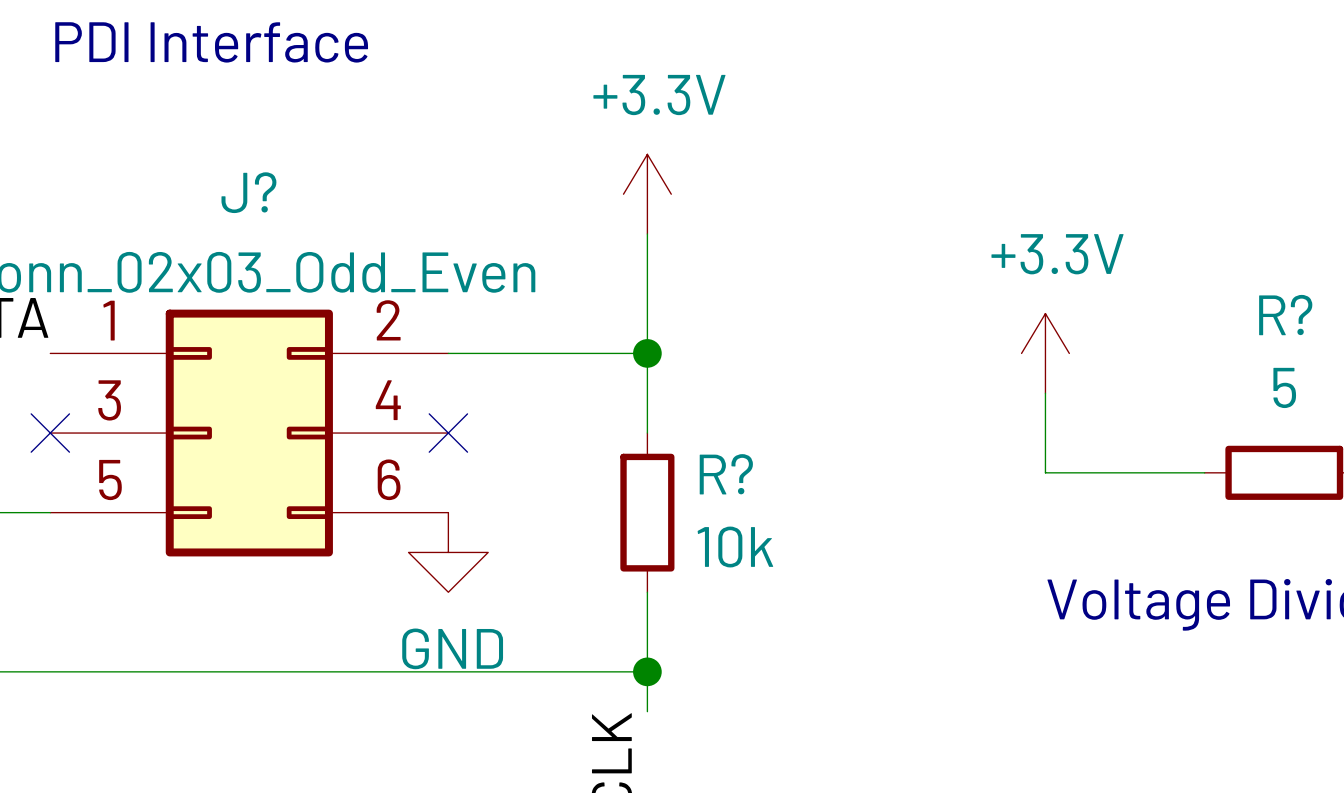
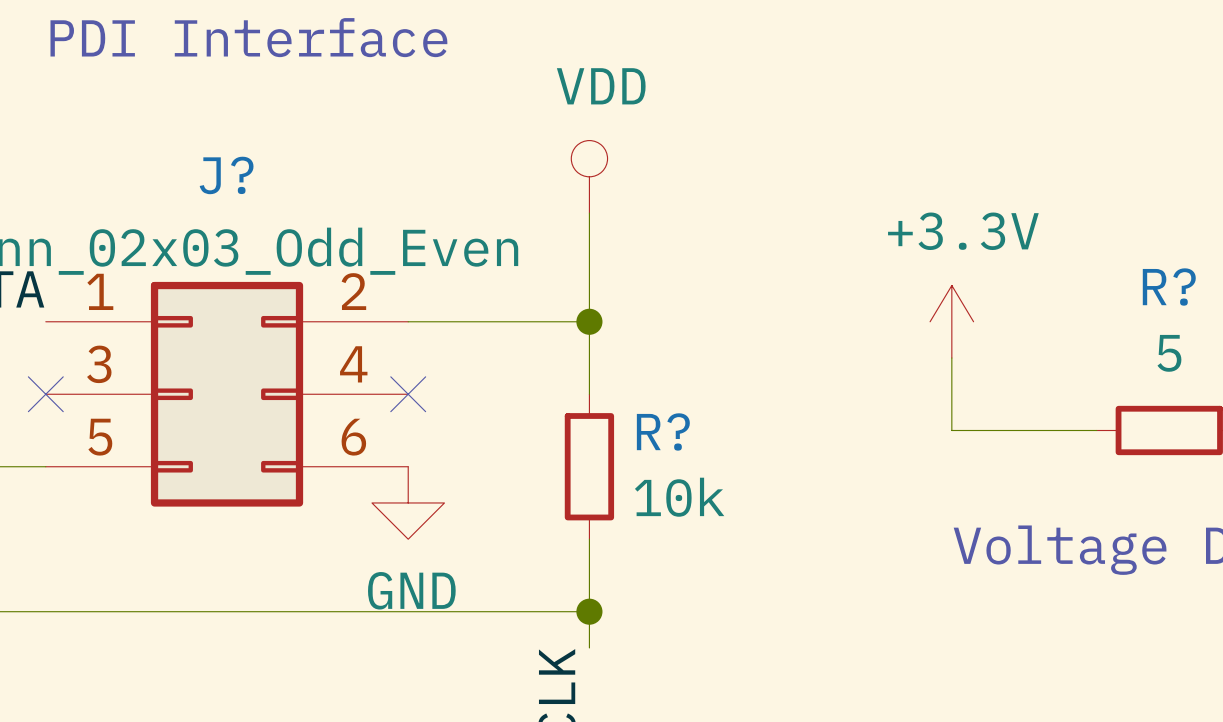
power symbol: +3.3V (647, 194) -> VDD (589, 176)

